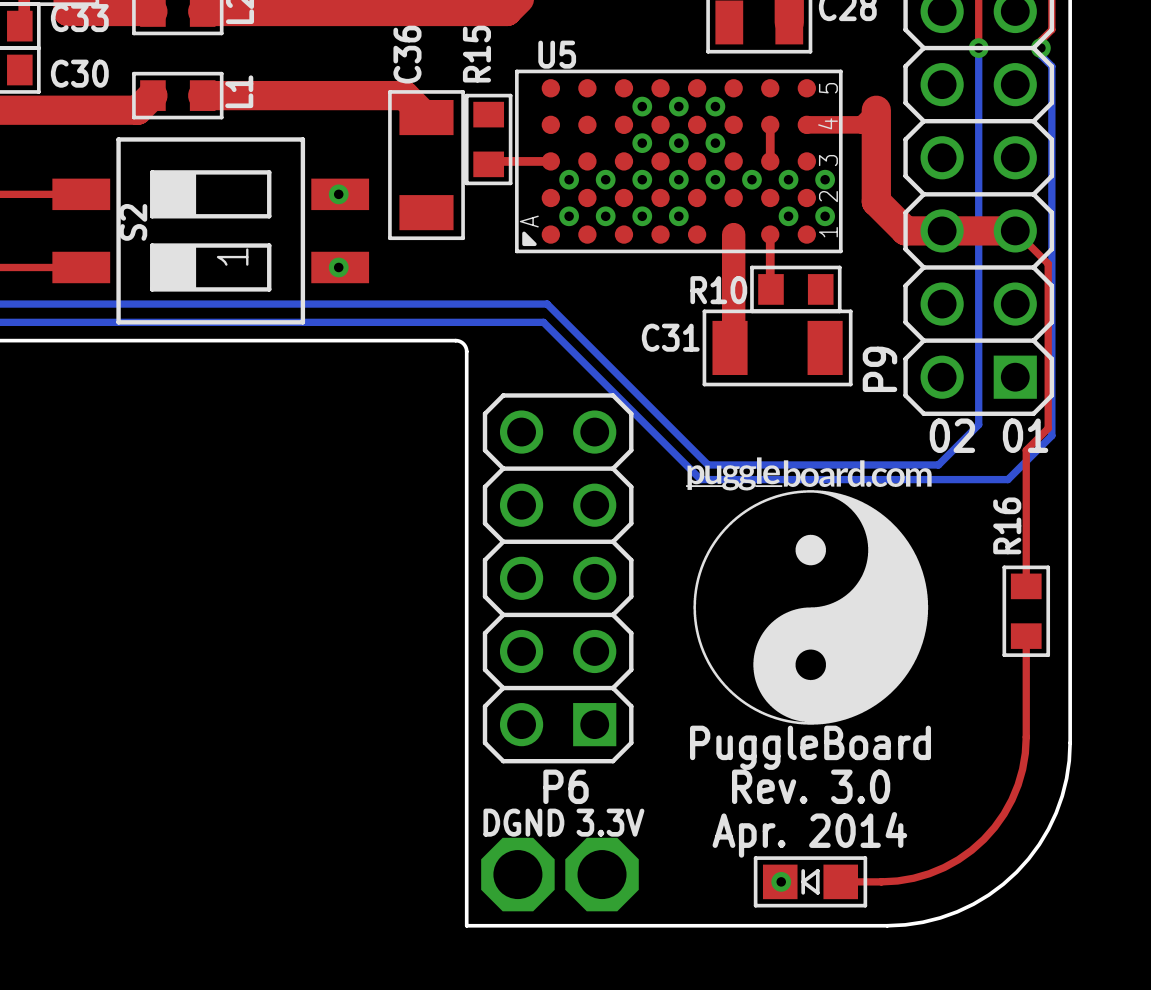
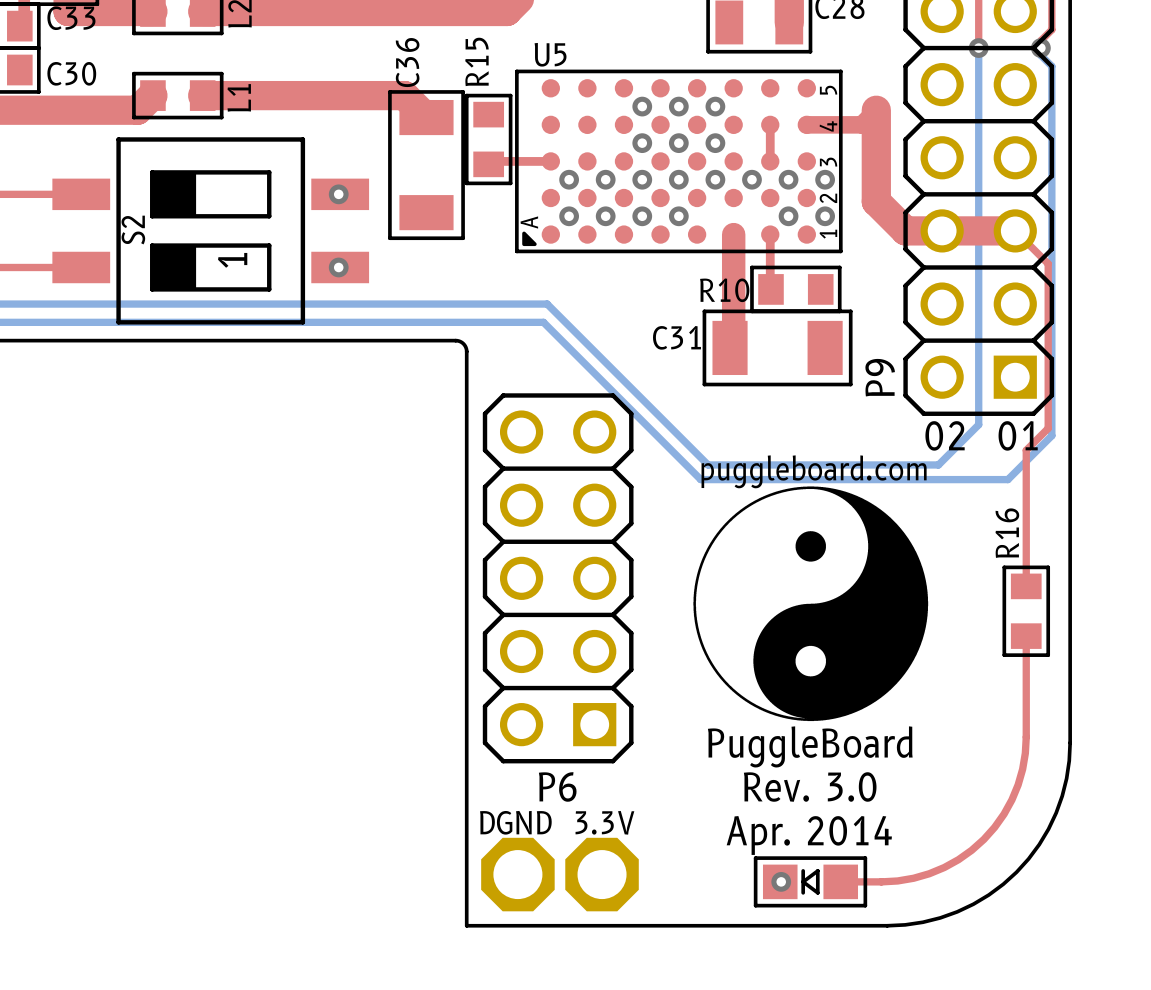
drawing shape: [686, 457, 932, 725] -> [693, 486, 929, 722]
text: none -> puggleboard.com (814, 471)

